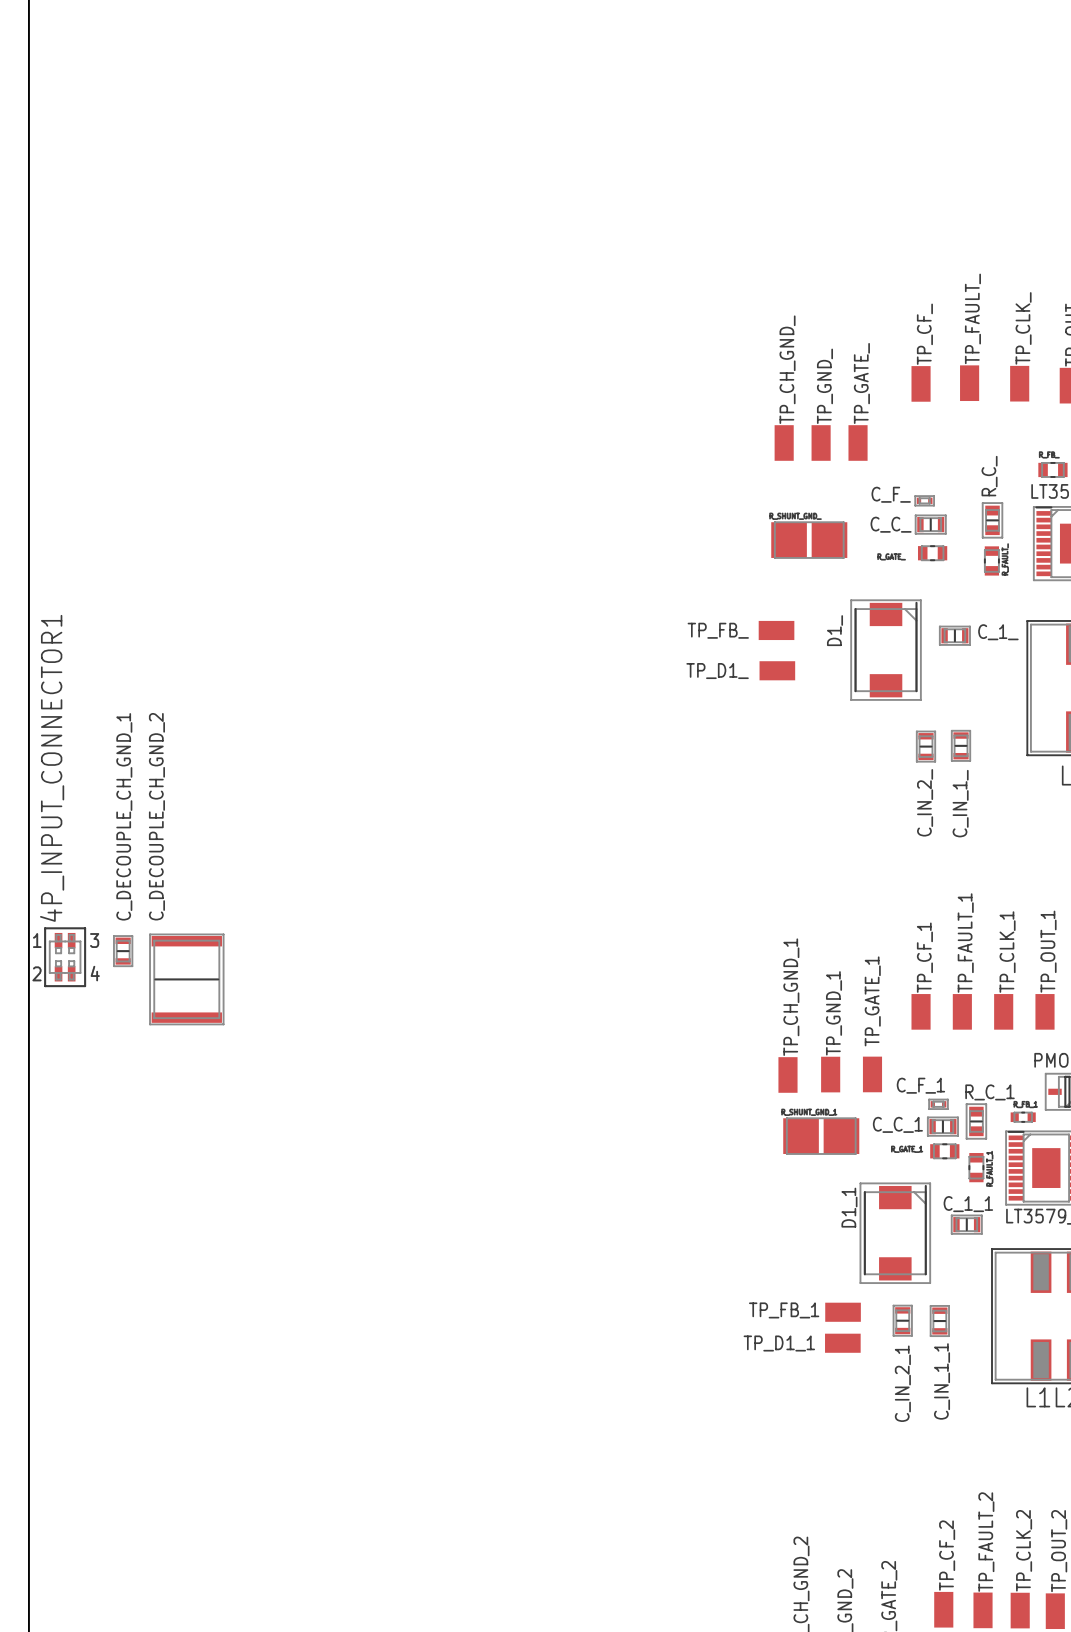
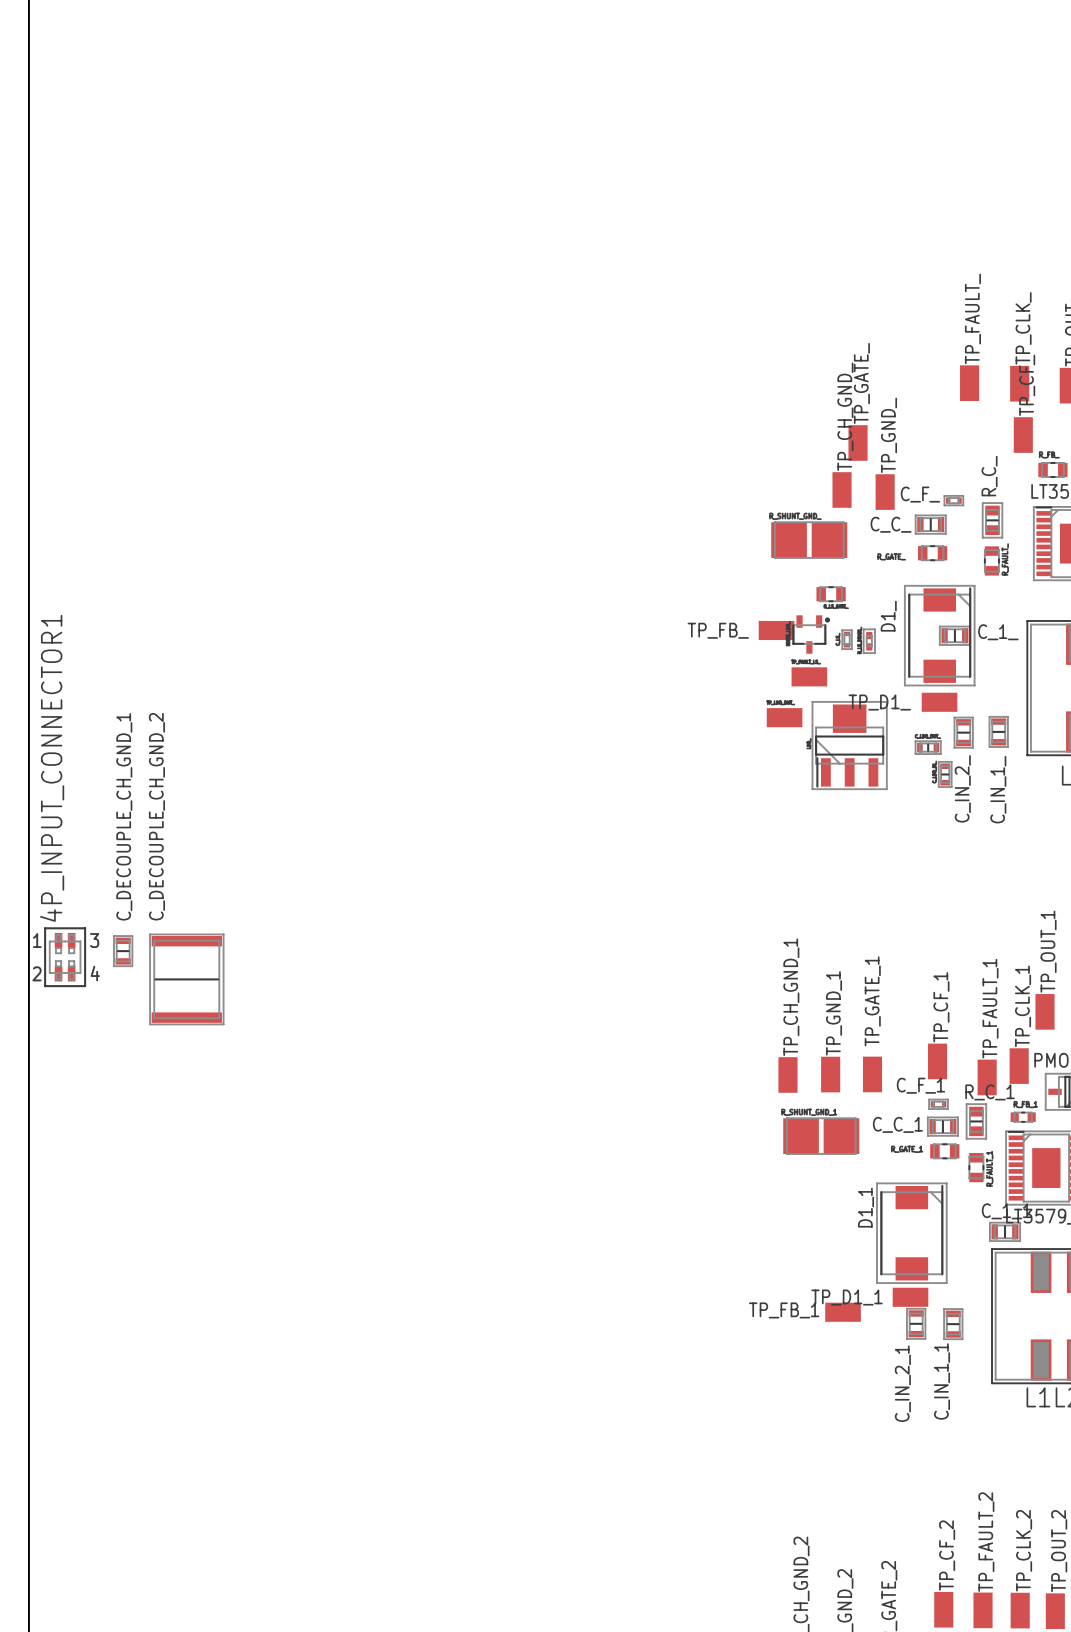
TP_CF_ position: (921, 383) -> (1023, 435)
TP_CH_GND_ position: (784, 442) -> (842, 489)
TP_GND_ position: (821, 442) -> (885, 492)
C_F_ position: (924, 500) -> (953, 500)
part: none -> (831, 594)
part: none -> (811, 634)
part: none -> (847, 639)
part: none -> (869, 641)
D1_ position: (886, 650) -> (939, 635)
TP_D1_ position: (777, 670) -> (939, 702)
part: none -> (809, 676)
part: none -> (784, 717)
part: none -> (849, 745)
C_IN_1_ position: (961, 745) -> (998, 731)
C_IN_2_ position: (926, 746) -> (963, 732)
part: none -> (928, 747)
part: none -> (945, 774)
TP_CF_1 position: (921, 1011) -> (937, 1061)
TP_FAULT_1 position: (962, 1011) -> (987, 1077)
TP_CLK_1 position: (1003, 1011) -> (1019, 1066)
C_1_1 position: (966, 1224) -> (1005, 1231)
D1_1 position: (895, 1233) -> (911, 1233)
C_IN_2_1 position: (902, 1320) -> (916, 1323)
C_IN_1_1 position: (939, 1321) -> (953, 1324)
TP_D1_1 position: (842, 1343) -> (910, 1297)

